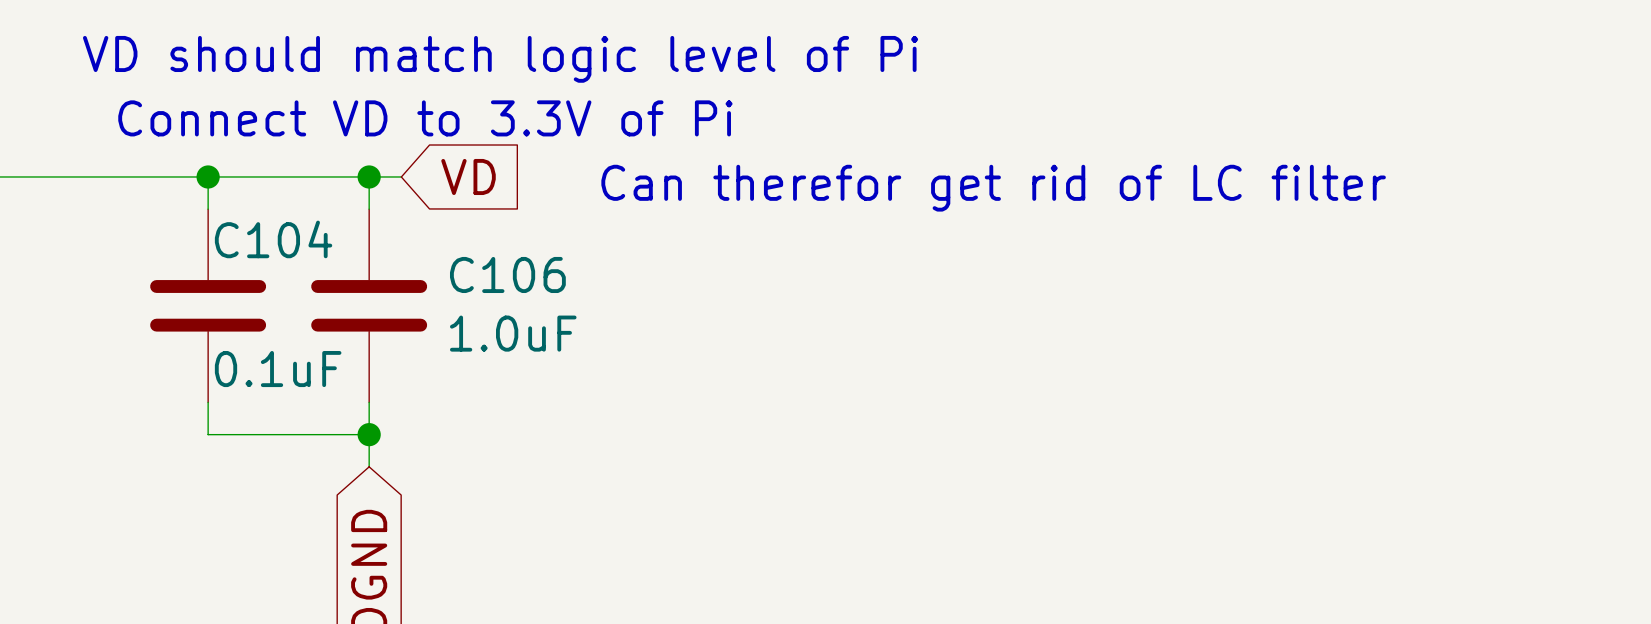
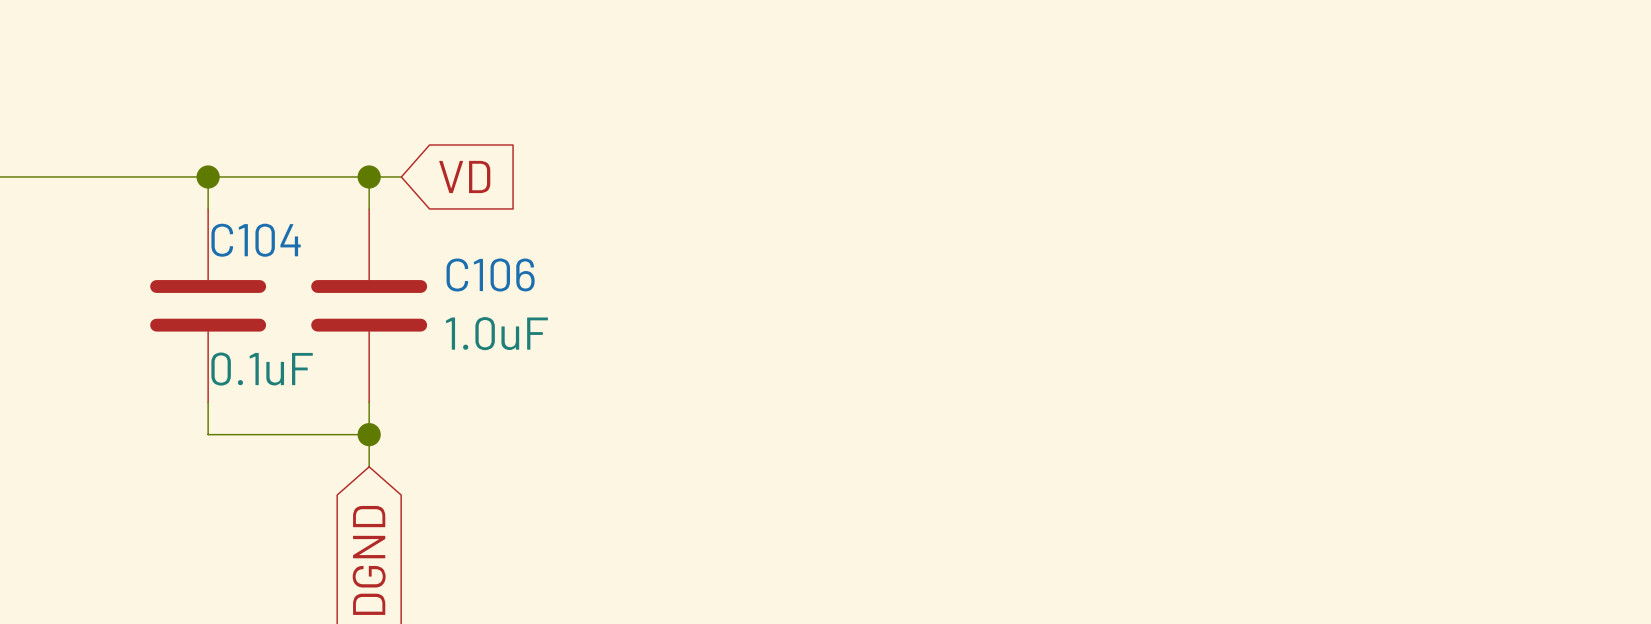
text: VD should match logic level of Pi (500, 59) -> none
text: Connect VD to 3.3V of Pi (425, 118) -> none
text: Can therefor get rid of LC filter (993, 188) -> none

